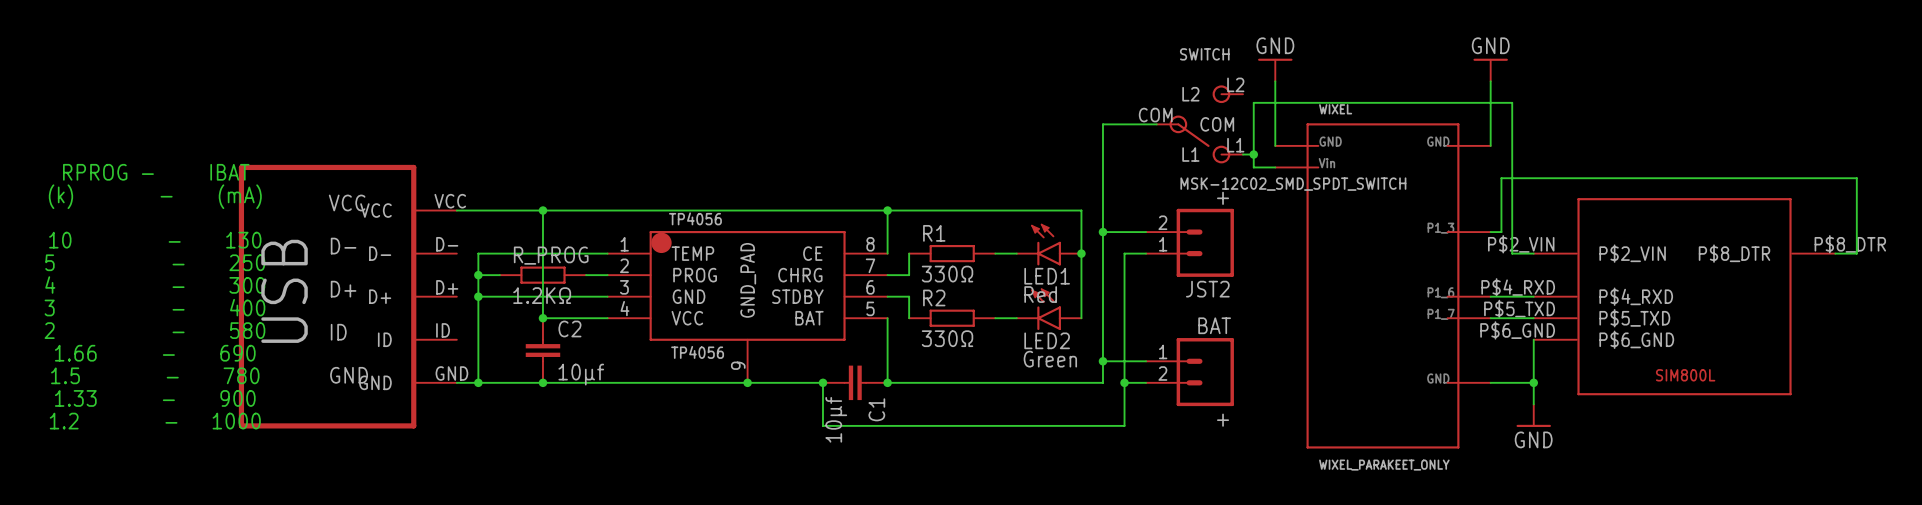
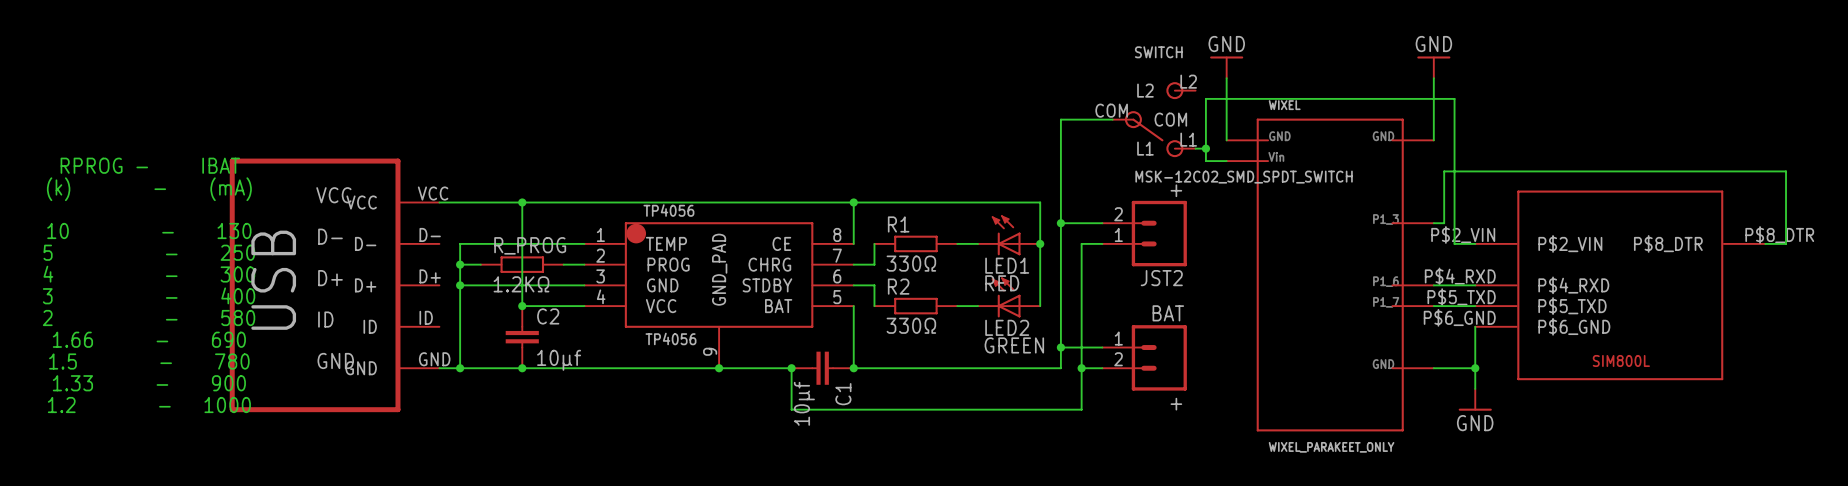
LED1 symbol: [1016, 223, 1082, 266] -> [978, 215, 1041, 256]
LED2 symbol: [1016, 288, 1082, 331] -> [978, 277, 1041, 318]
LED1 value: Red (1040, 294) -> RED (1002, 283)
LED2 value: Green (1050, 359) -> GREEN (1014, 345)

